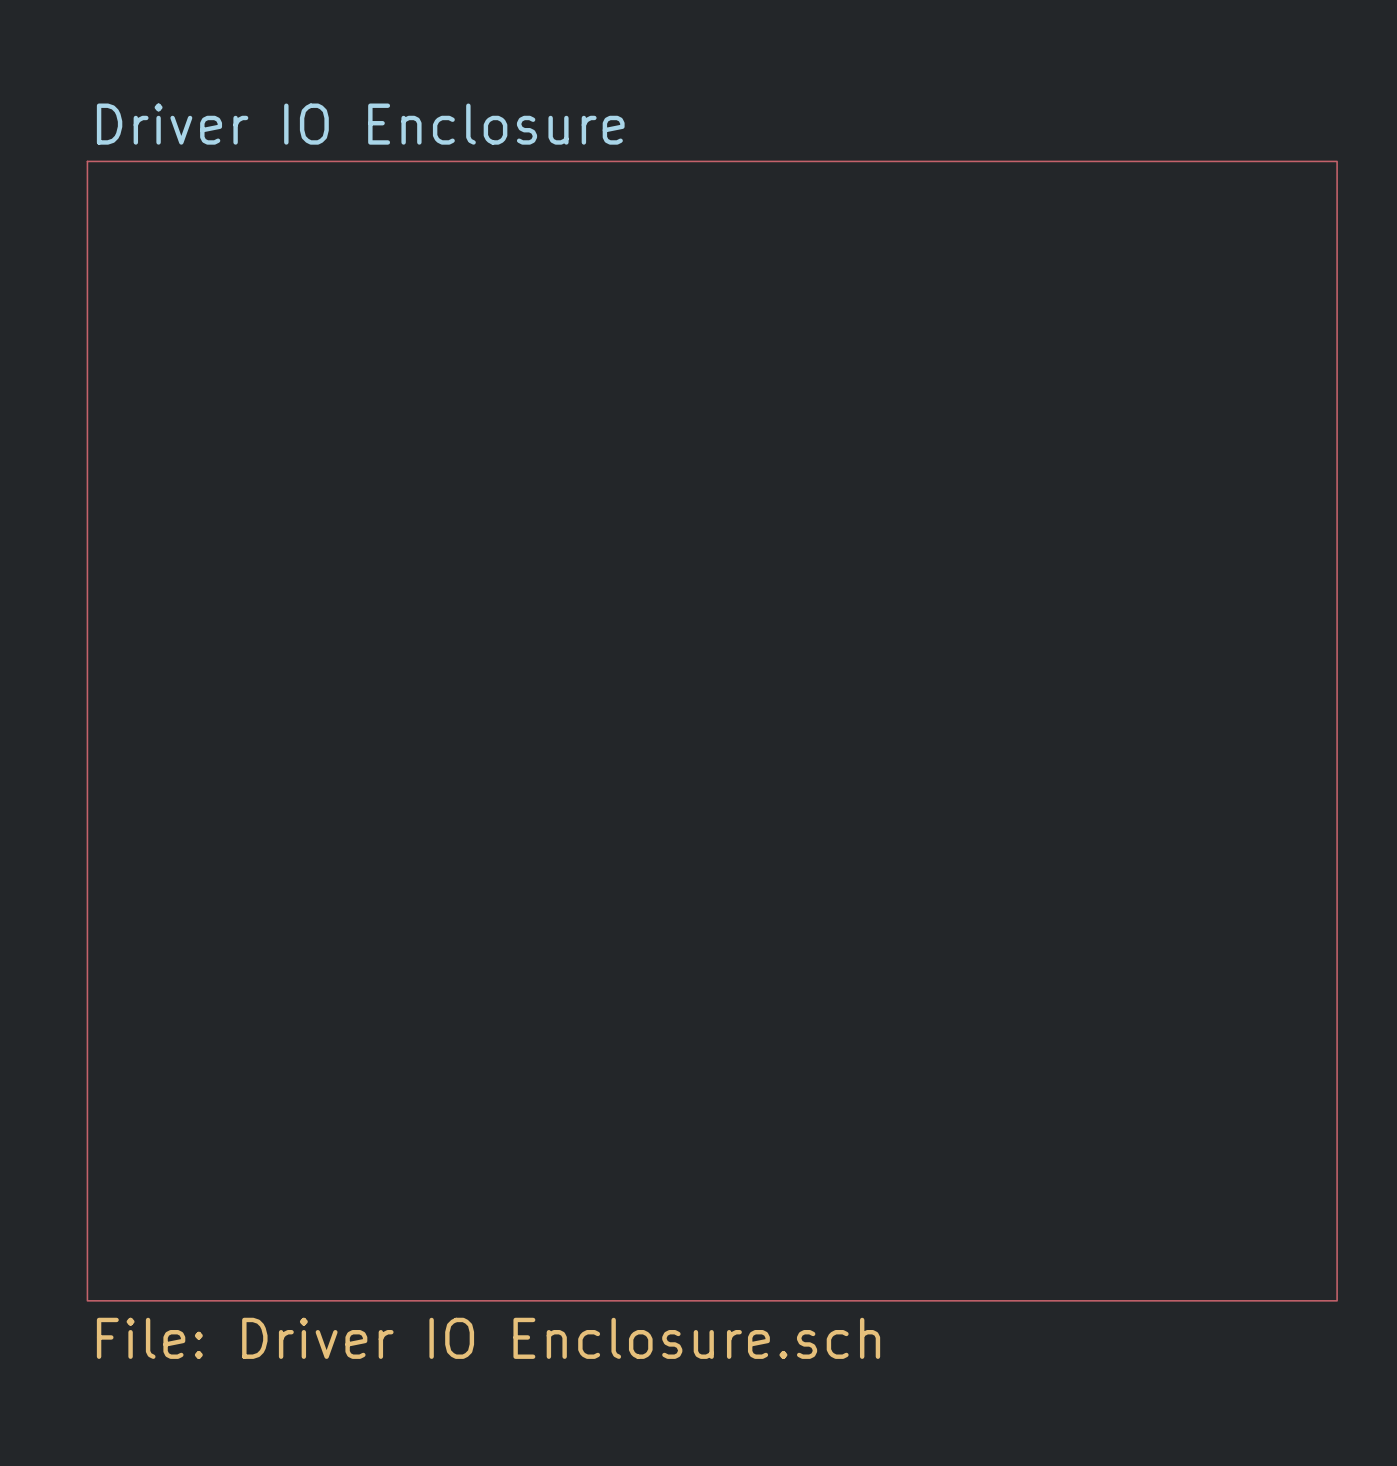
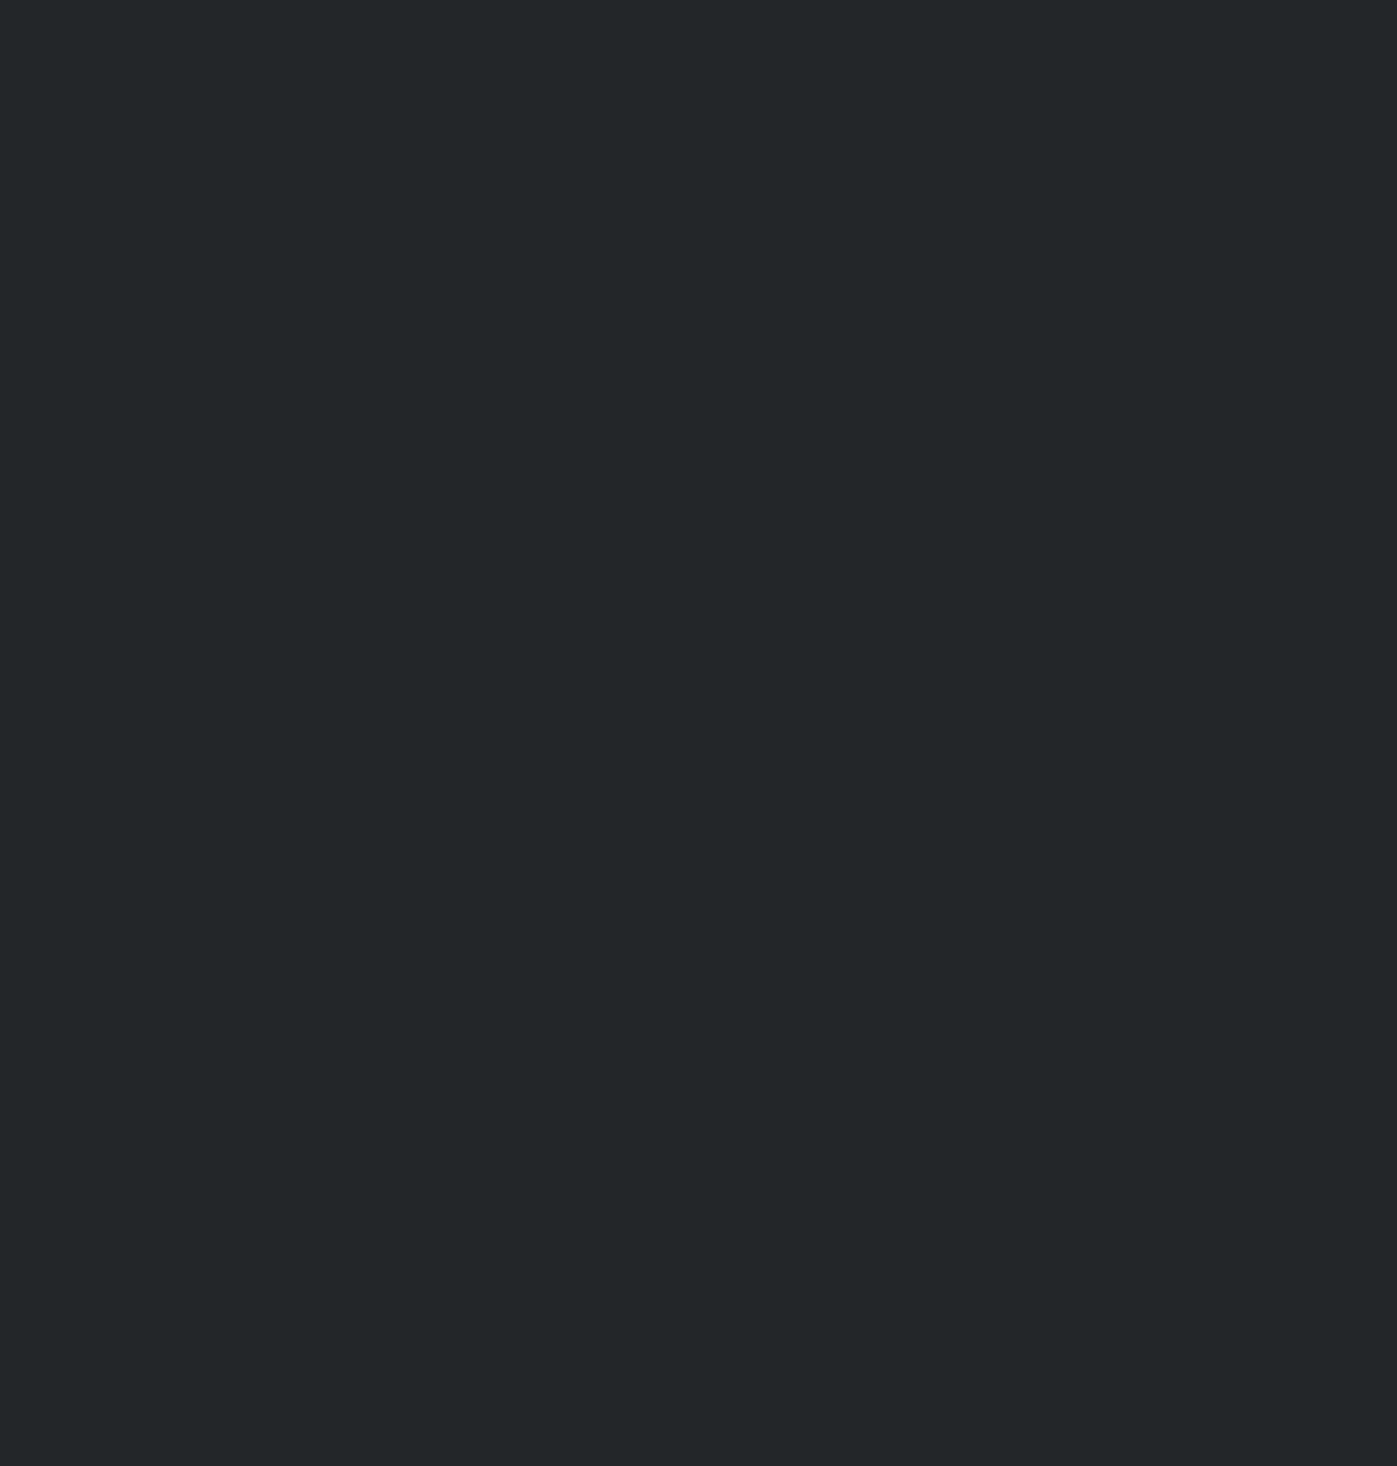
sheet Driver IO Enclosure: File: Driver IO Enclosure.sch (712, 731) -> none

